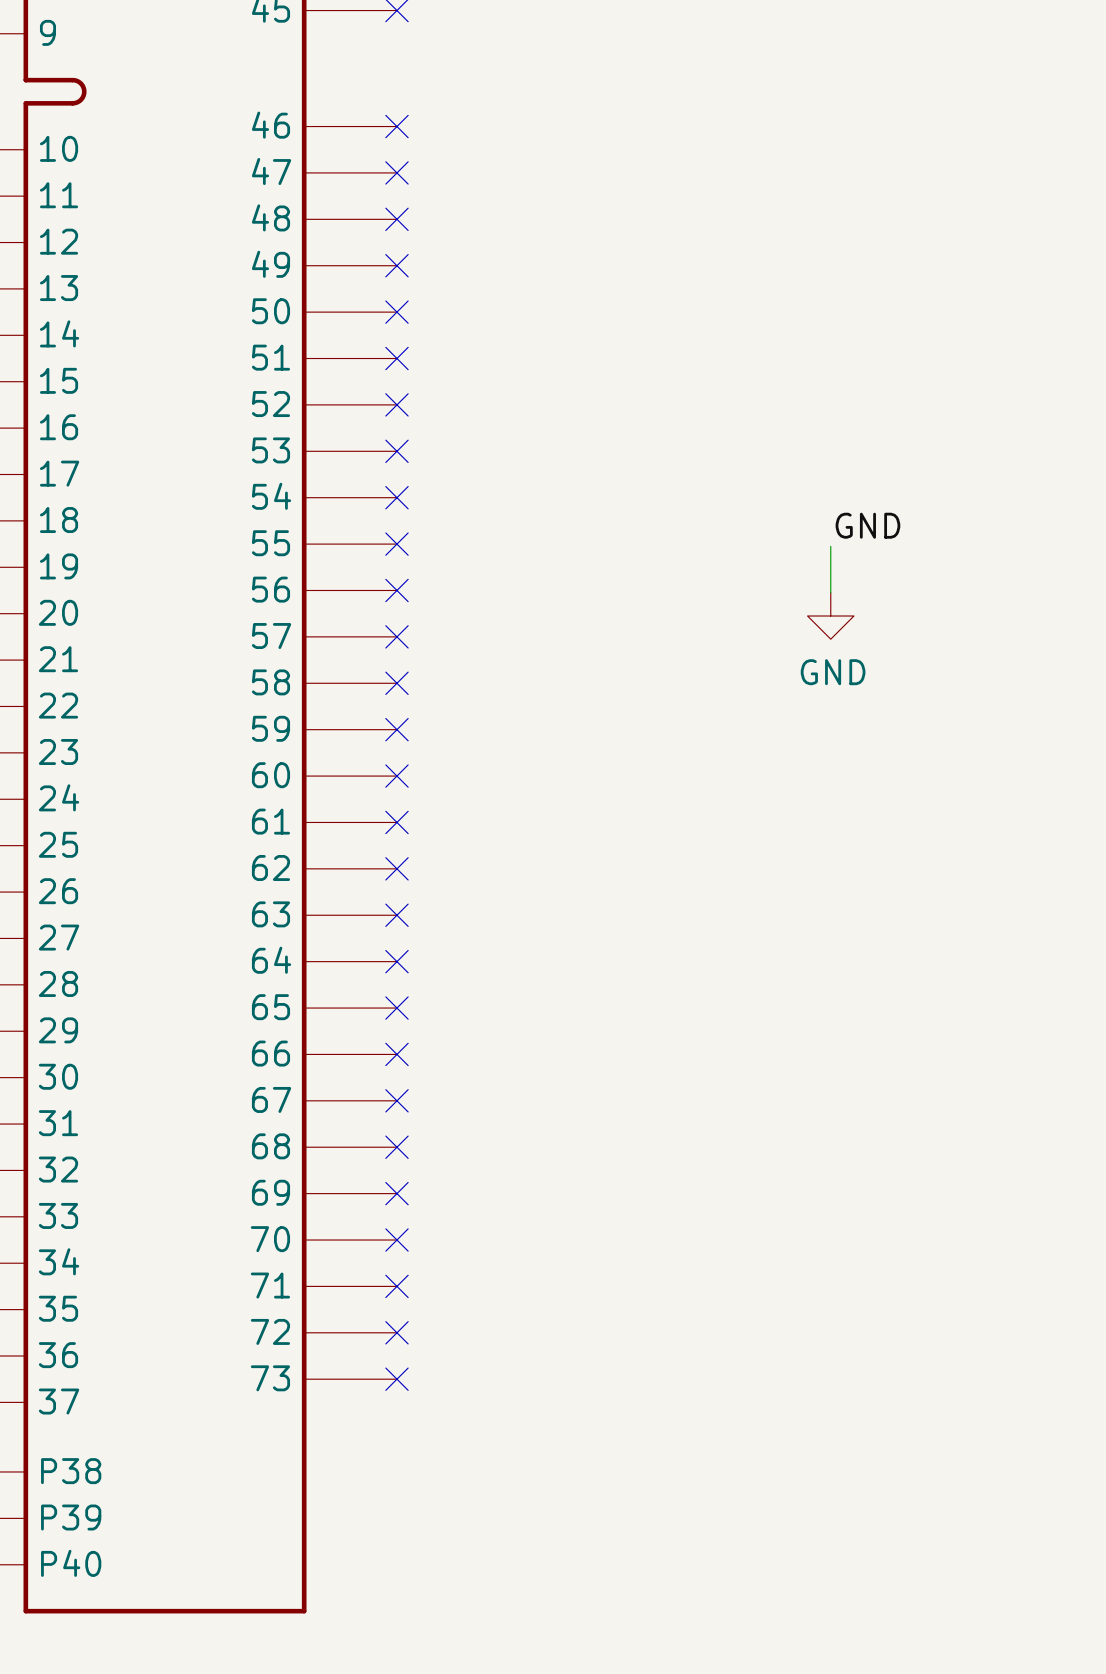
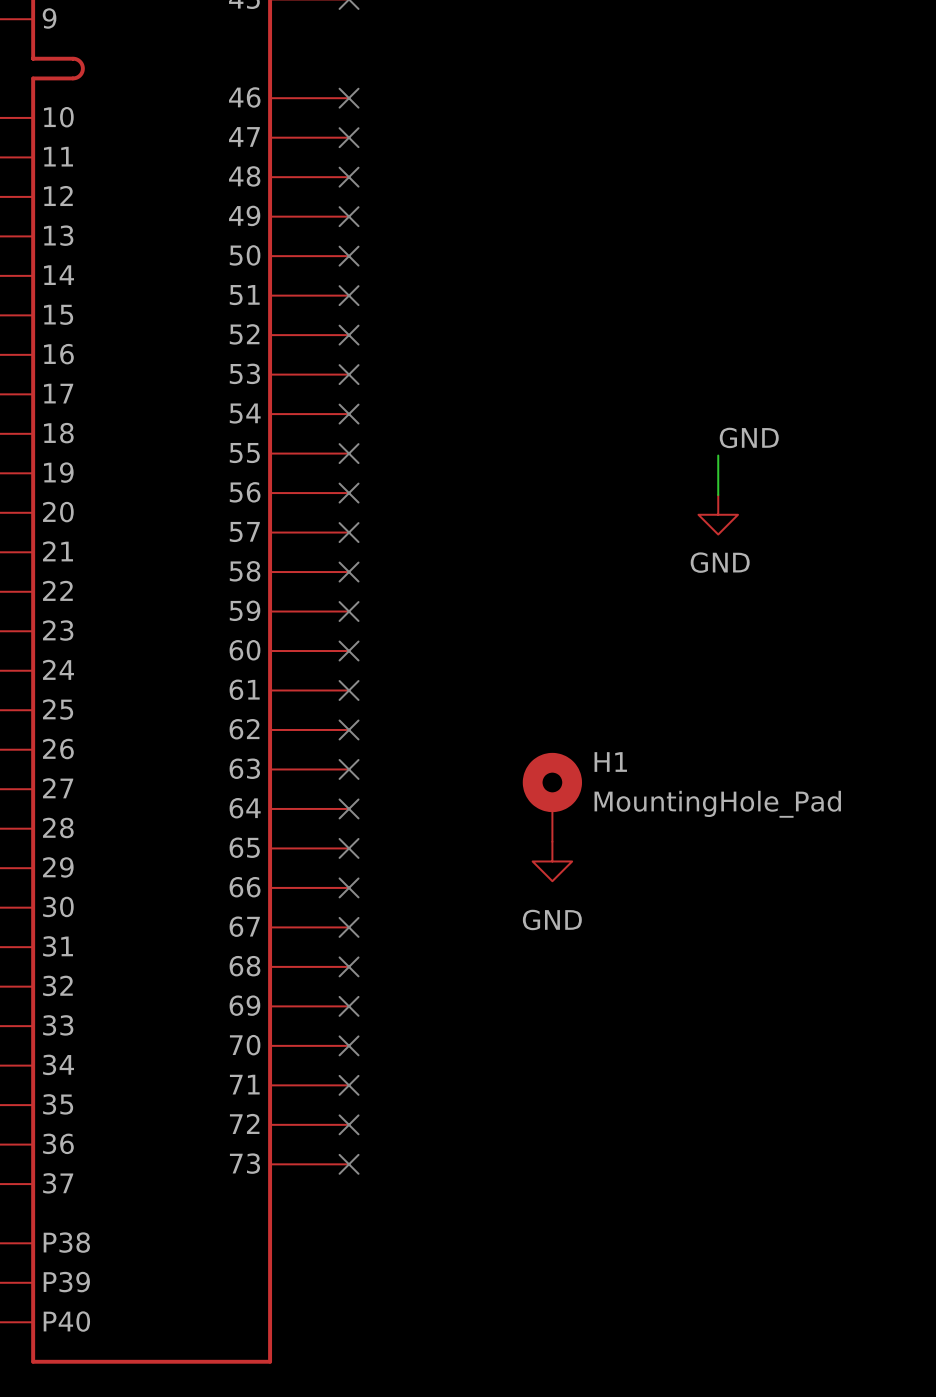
H1: none -> MountingHole_Pad (552, 797)
power symbol: none -> GND (552, 861)

